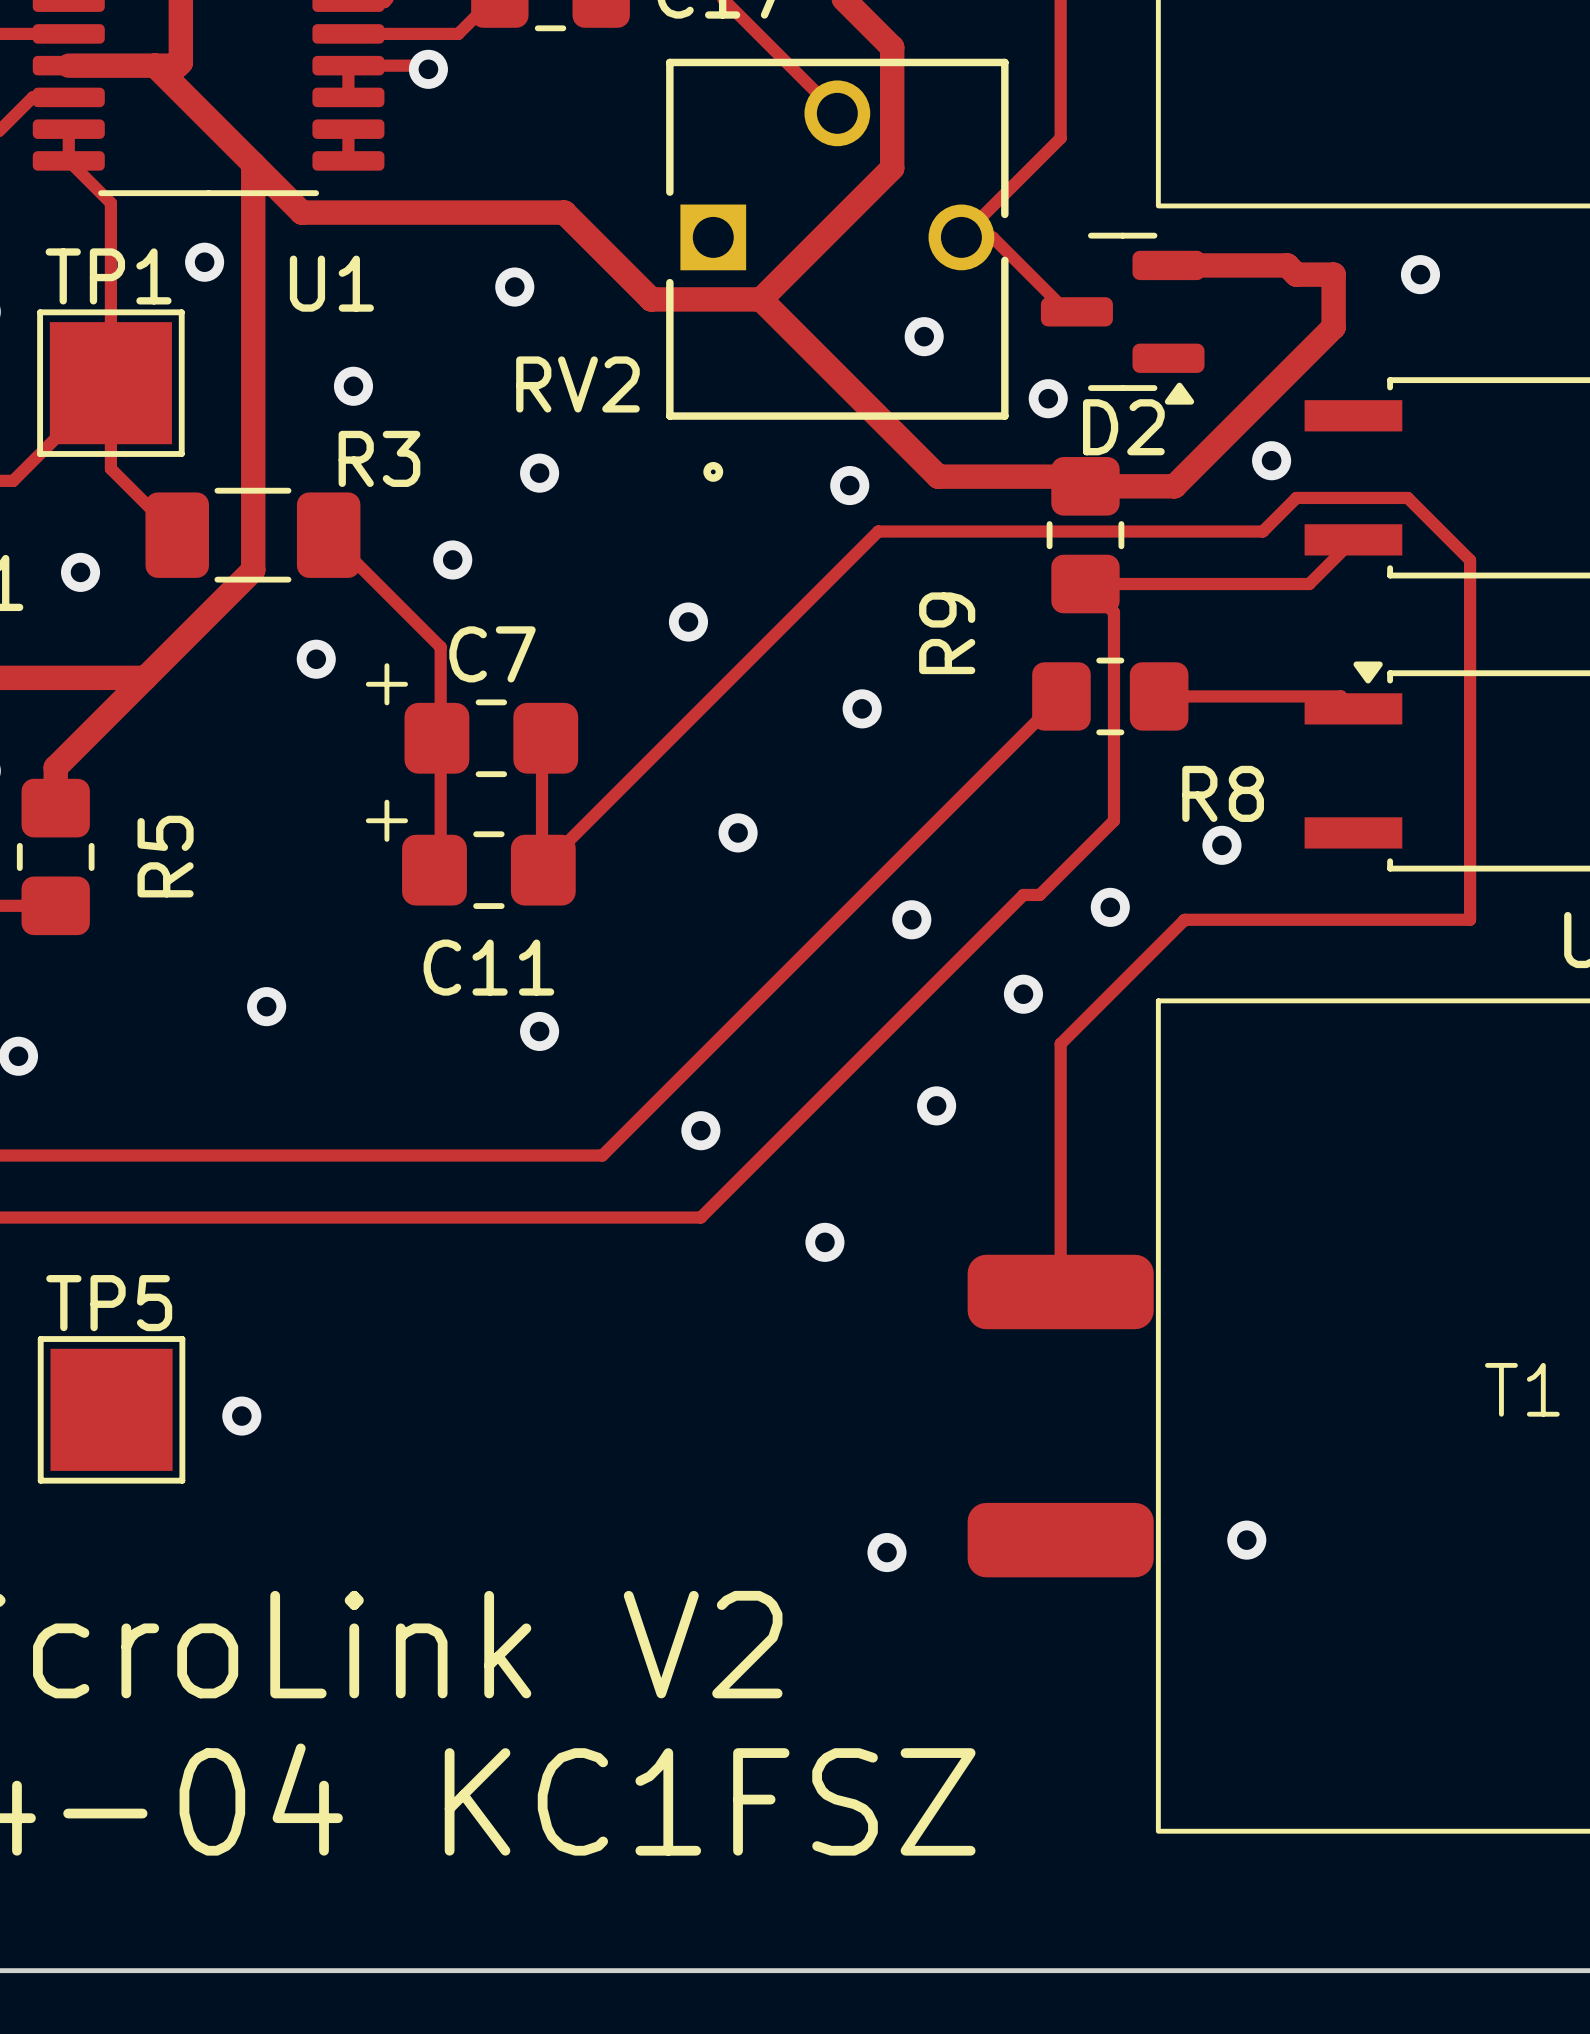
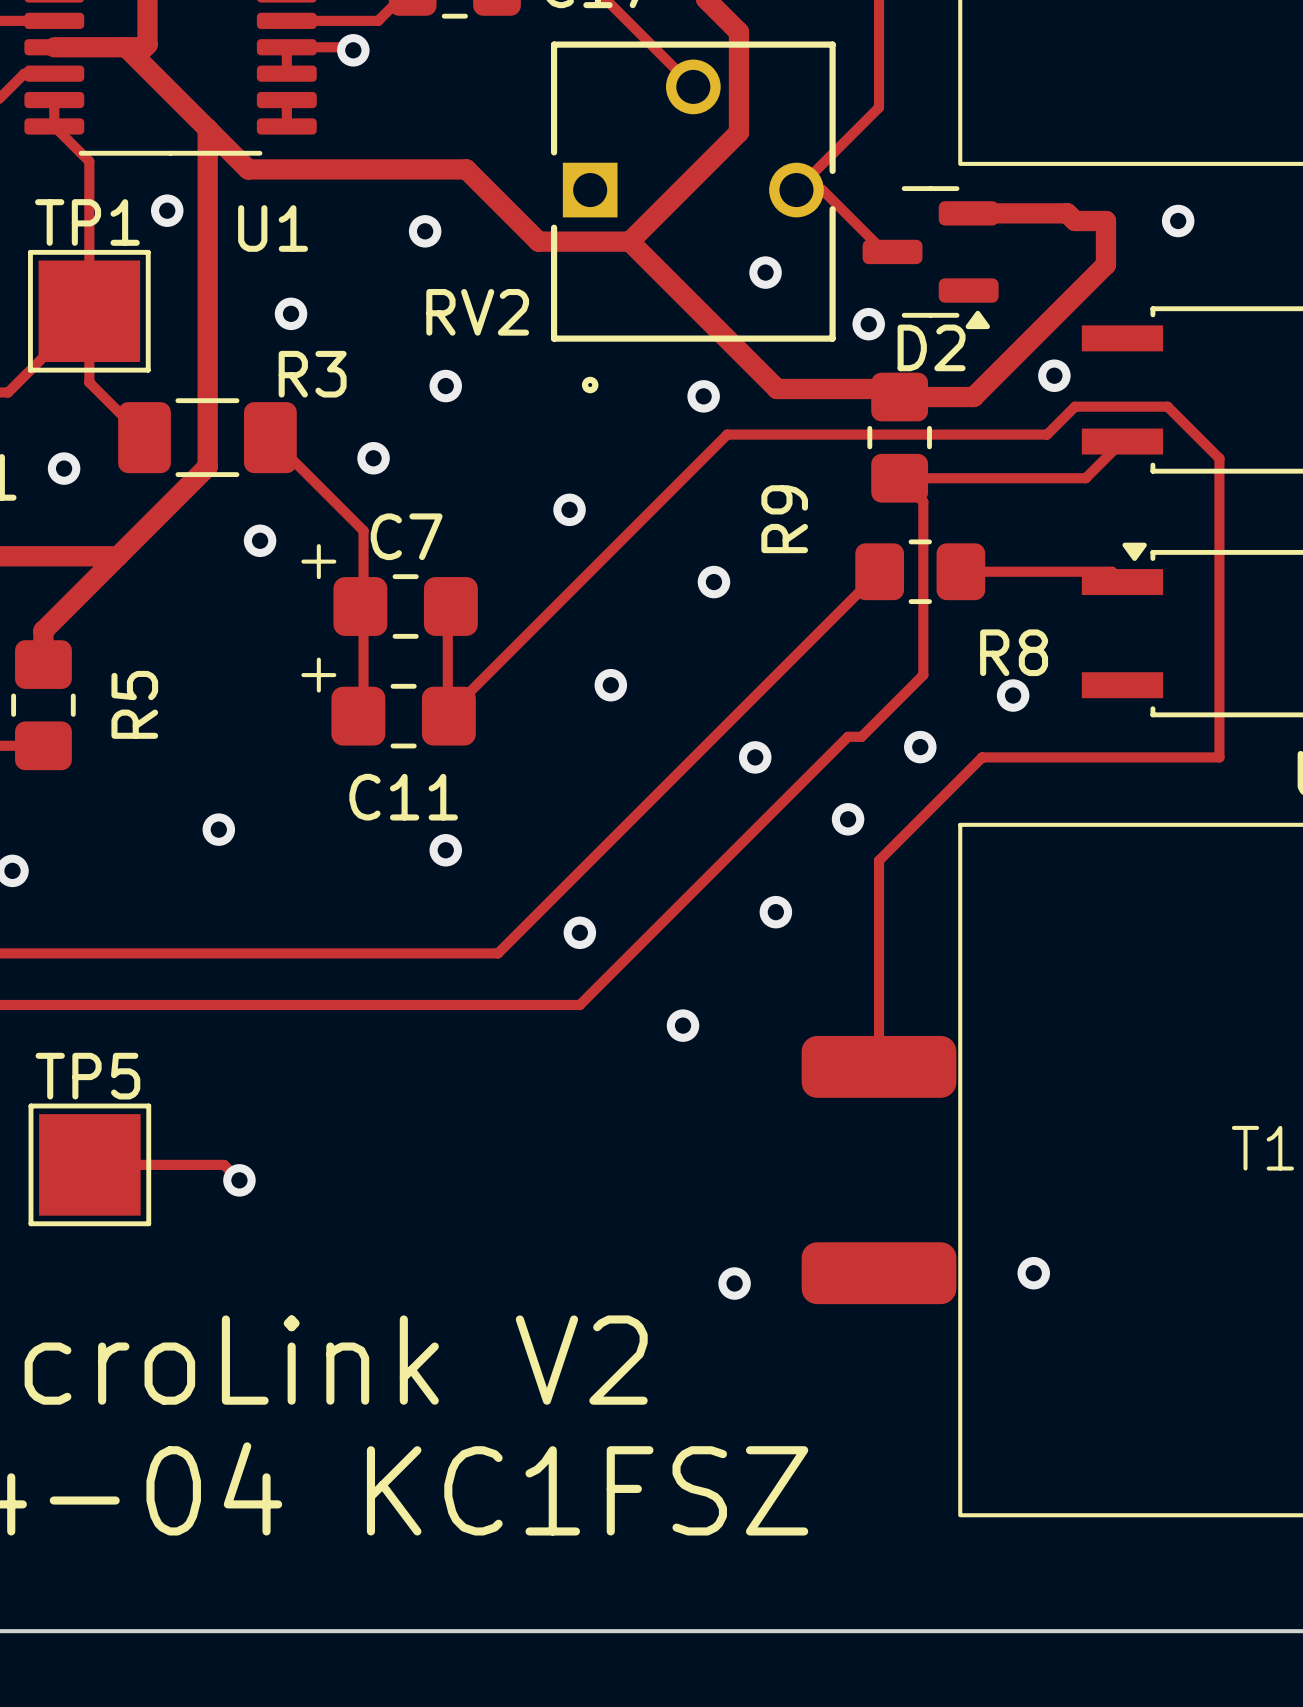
track: none -> (89, 1164) (223, 1164) (239, 1180)
via position: (241, 1416) -> (239, 1180)

